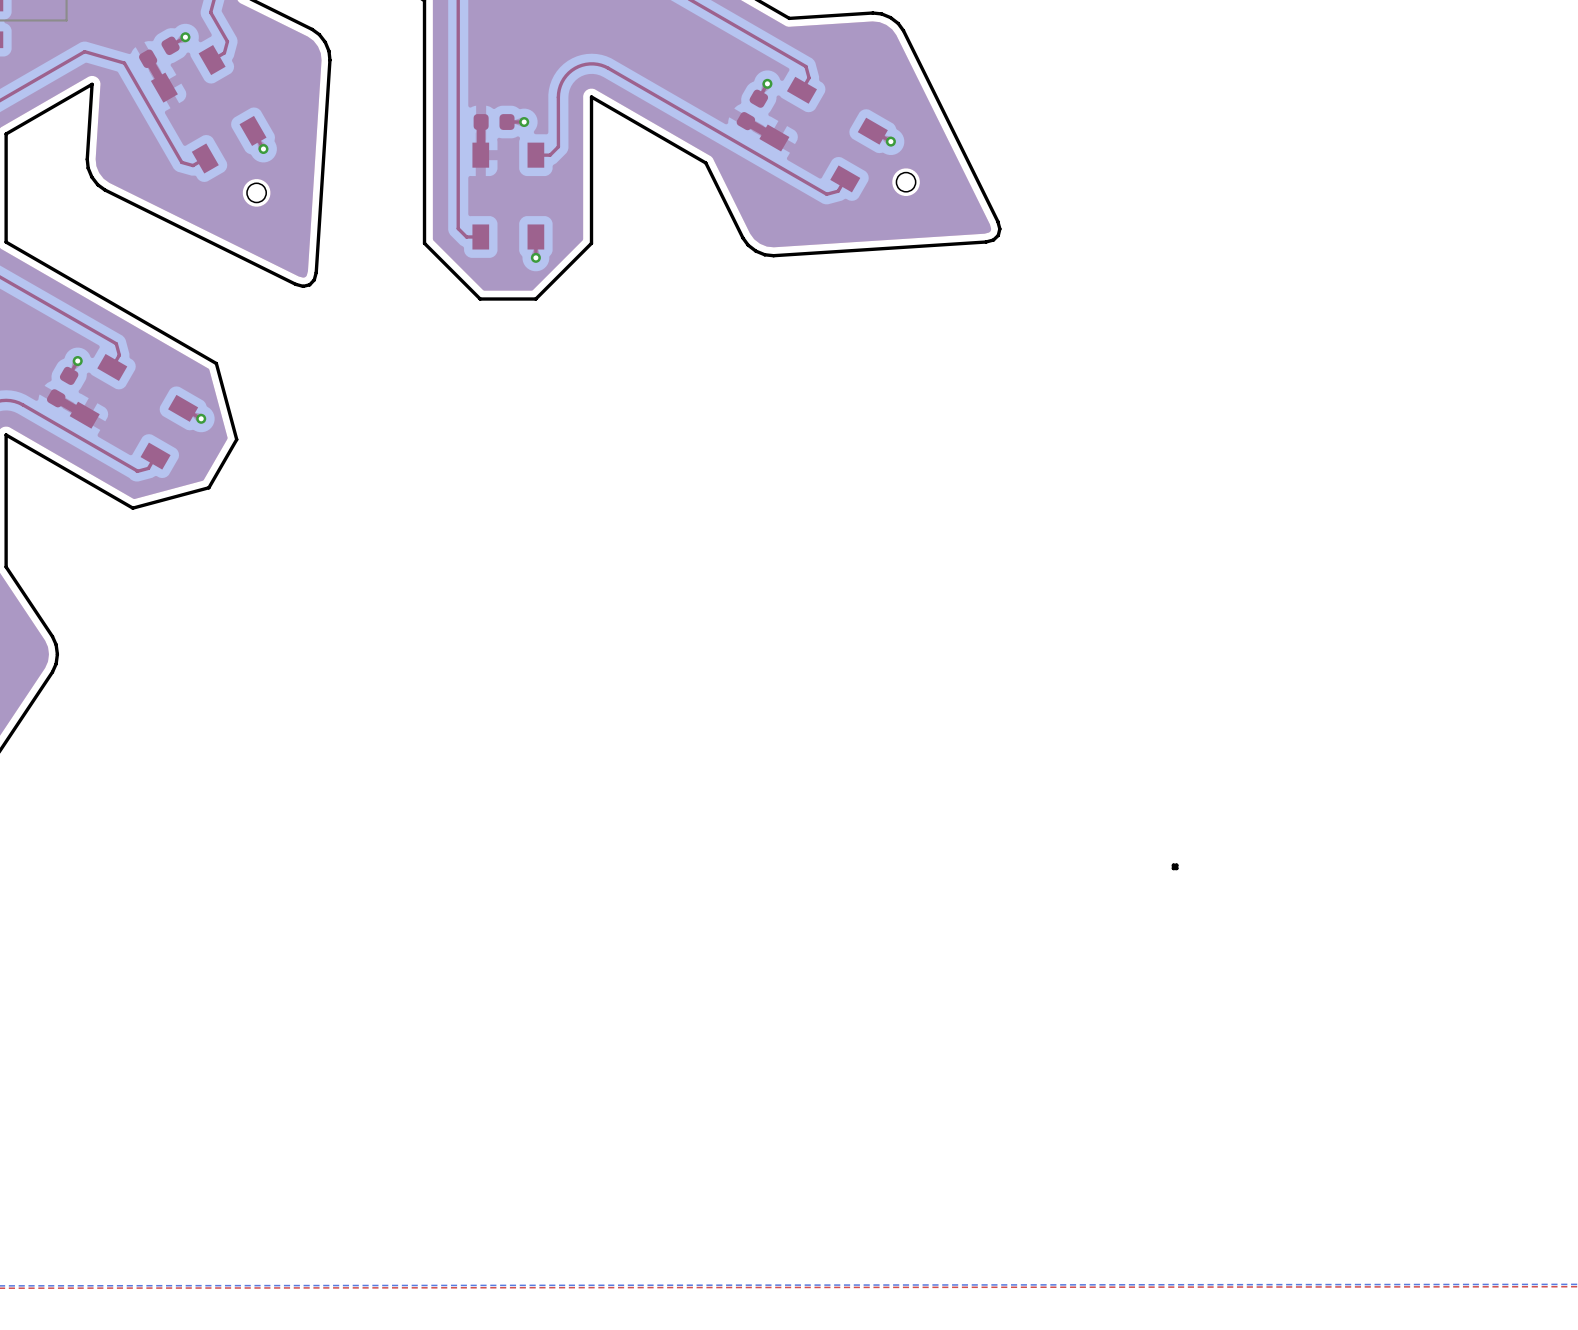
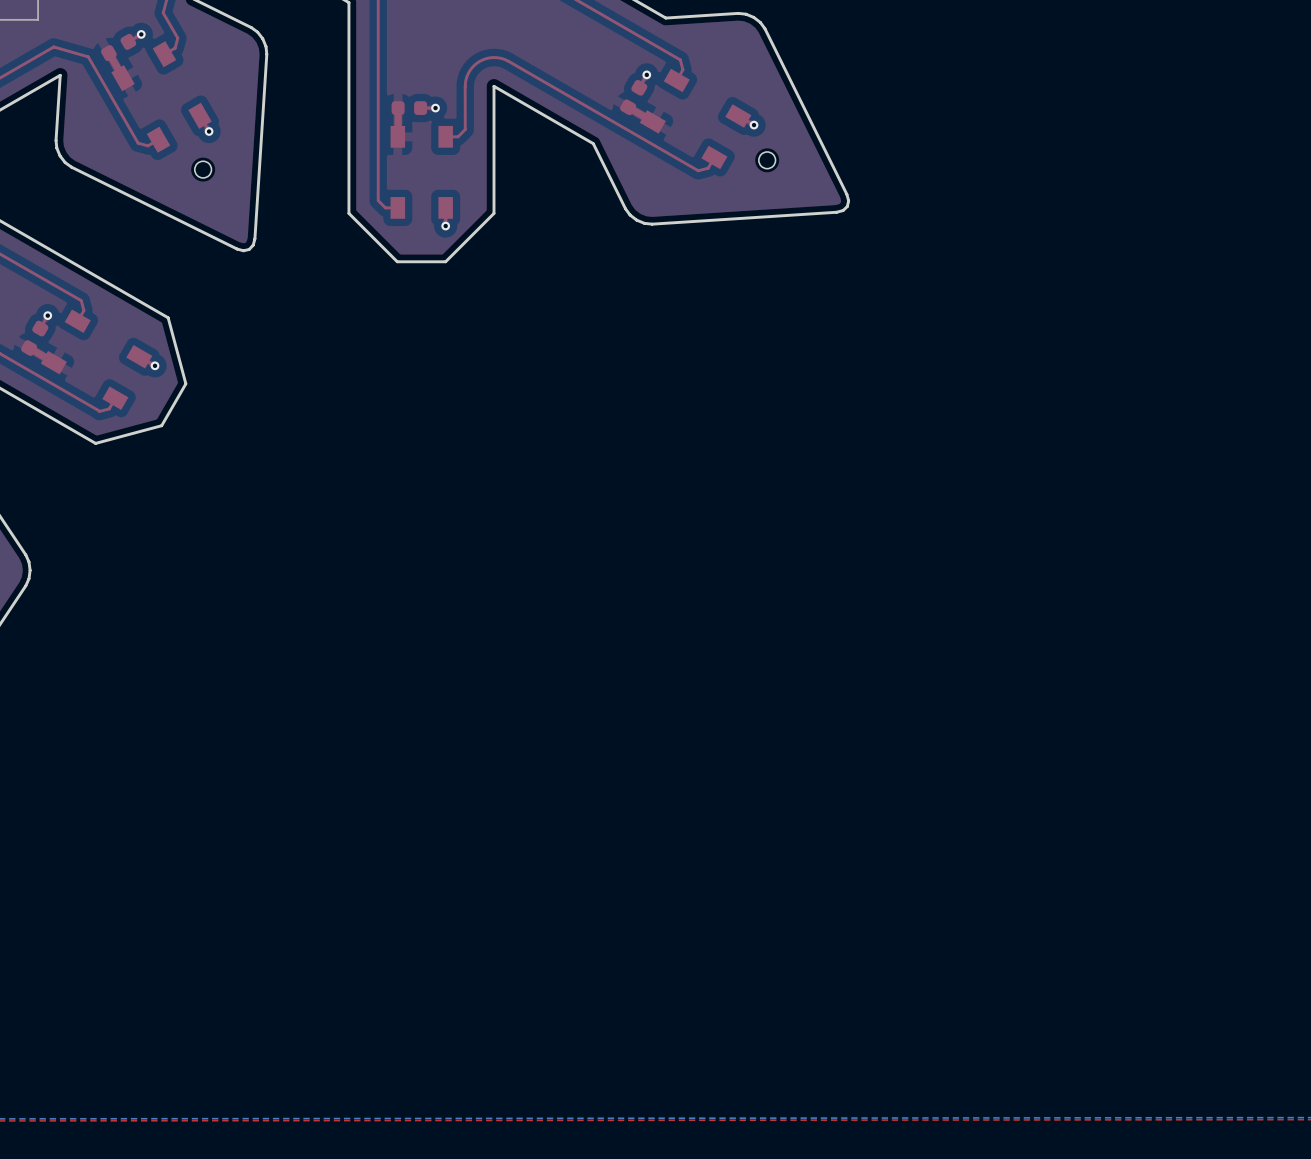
board edge: (1176, 865) (1173, 865) (1173, 868) (1176, 868) (1176, 865) -> none

